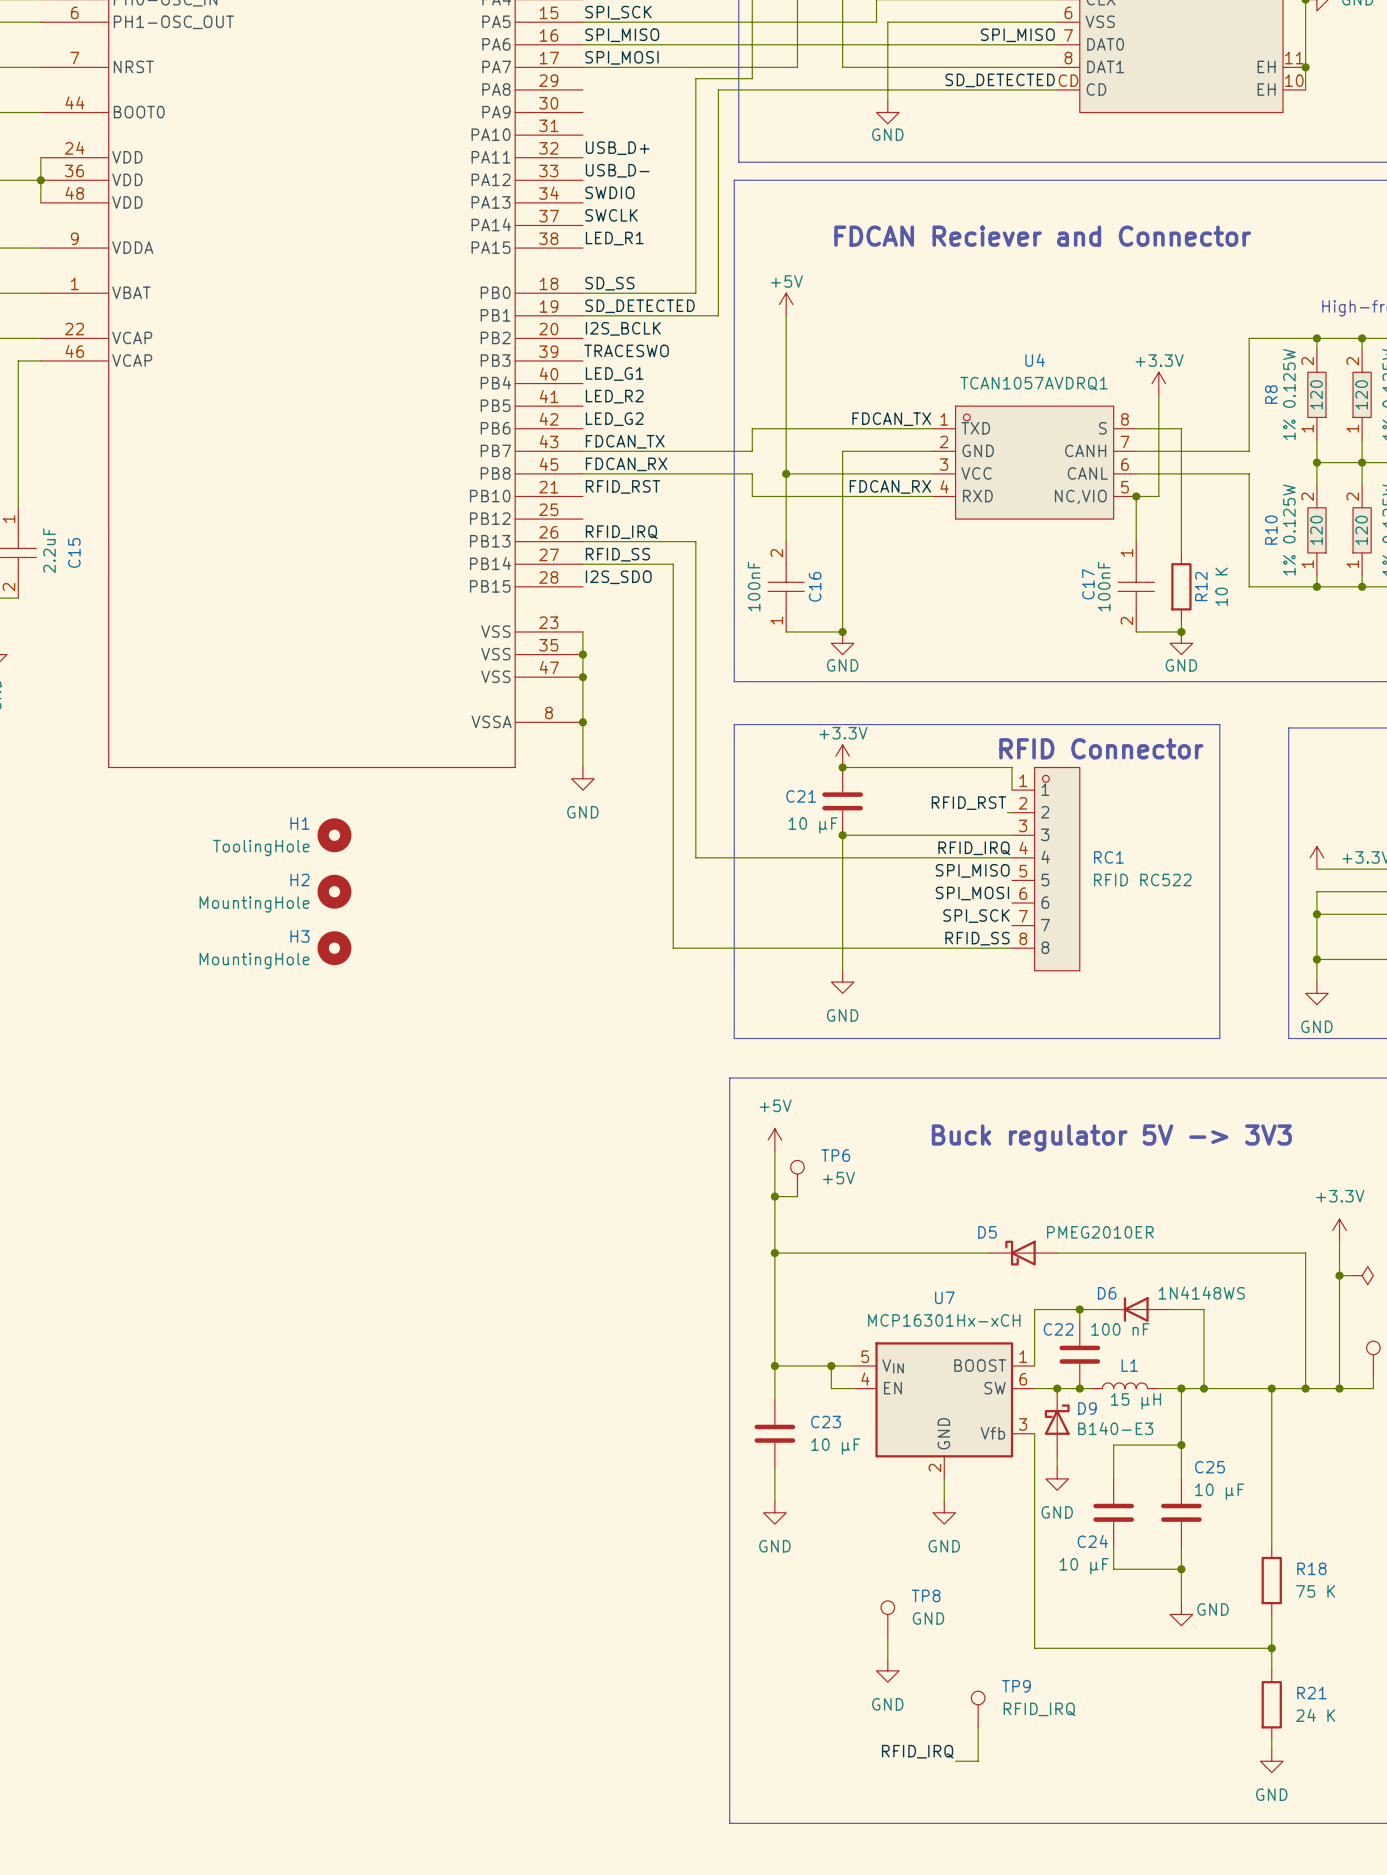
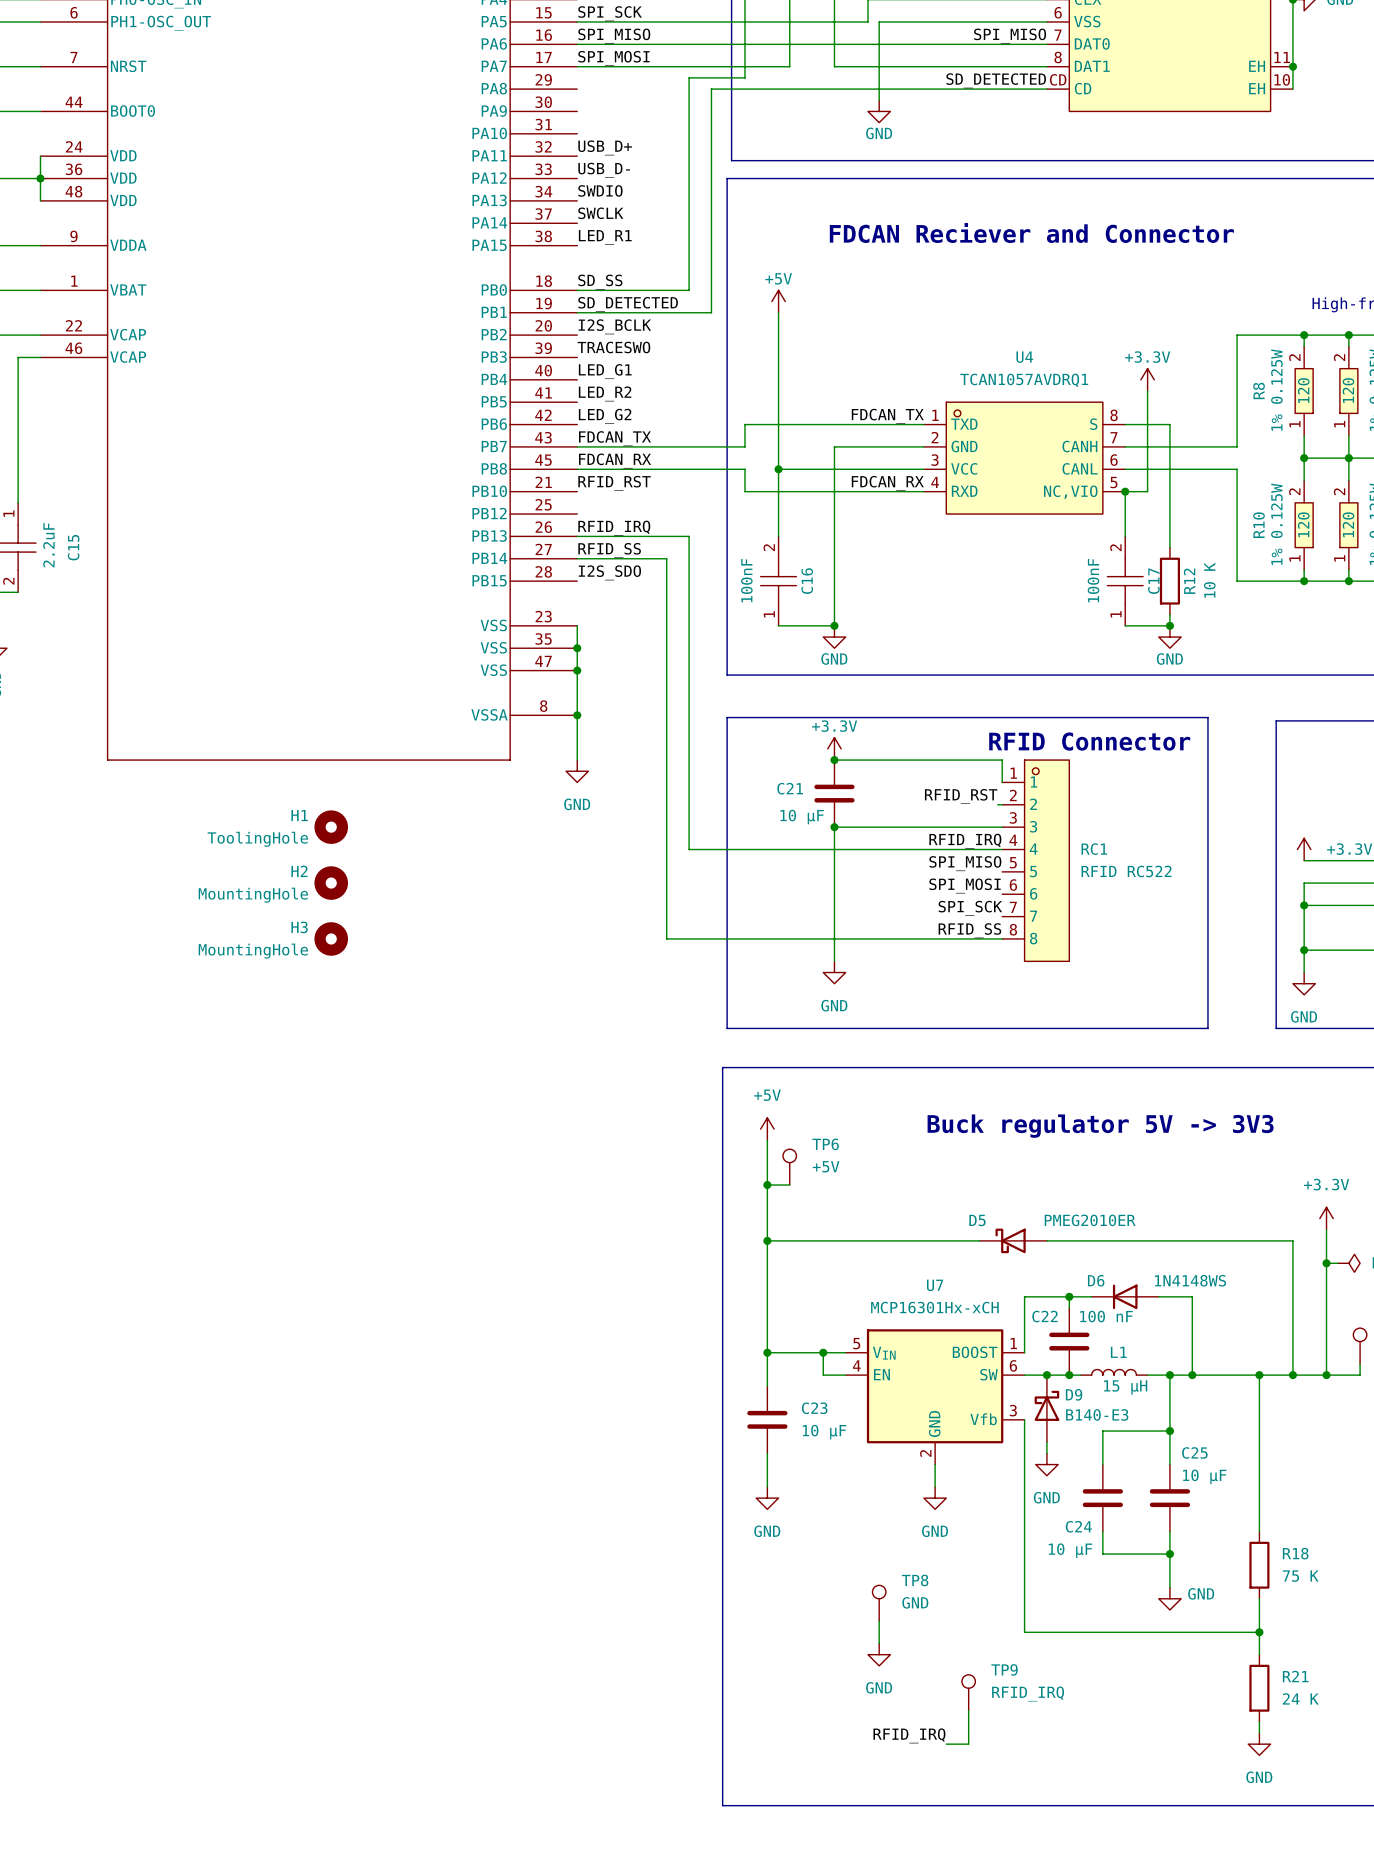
C17 name position: C17 (1088, 584) -> C17 (1153, 581)
C17 rotation: 0° (1136, 586) -> 180° (1125, 581)

